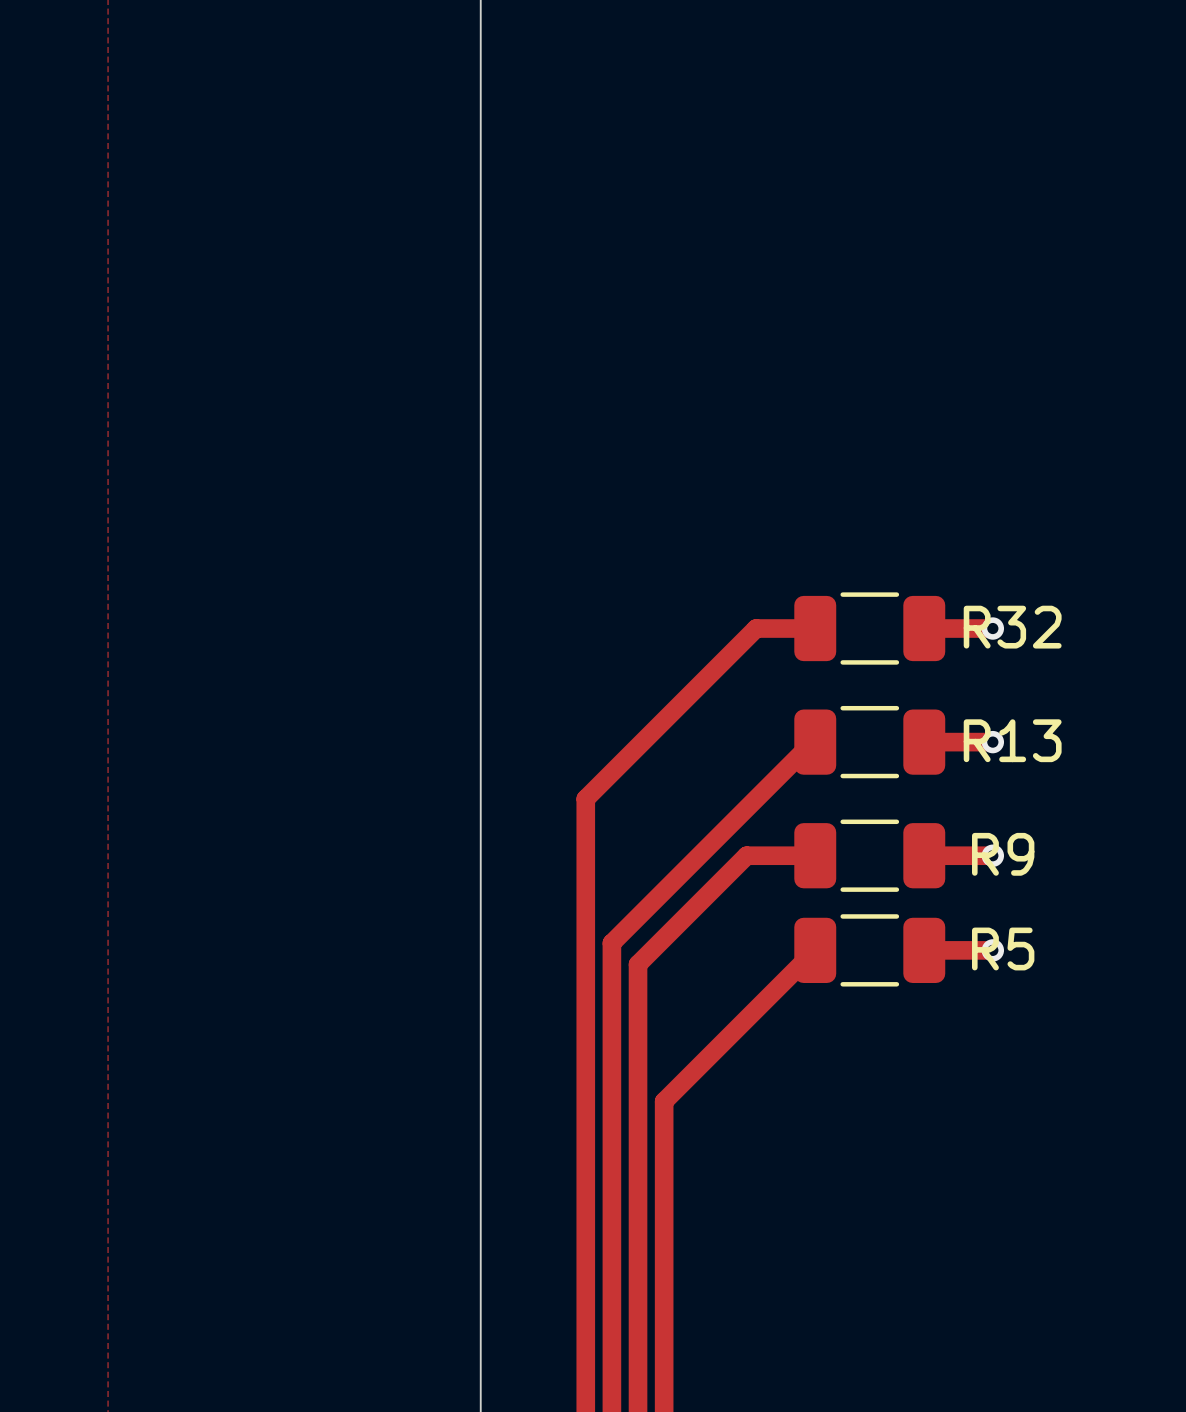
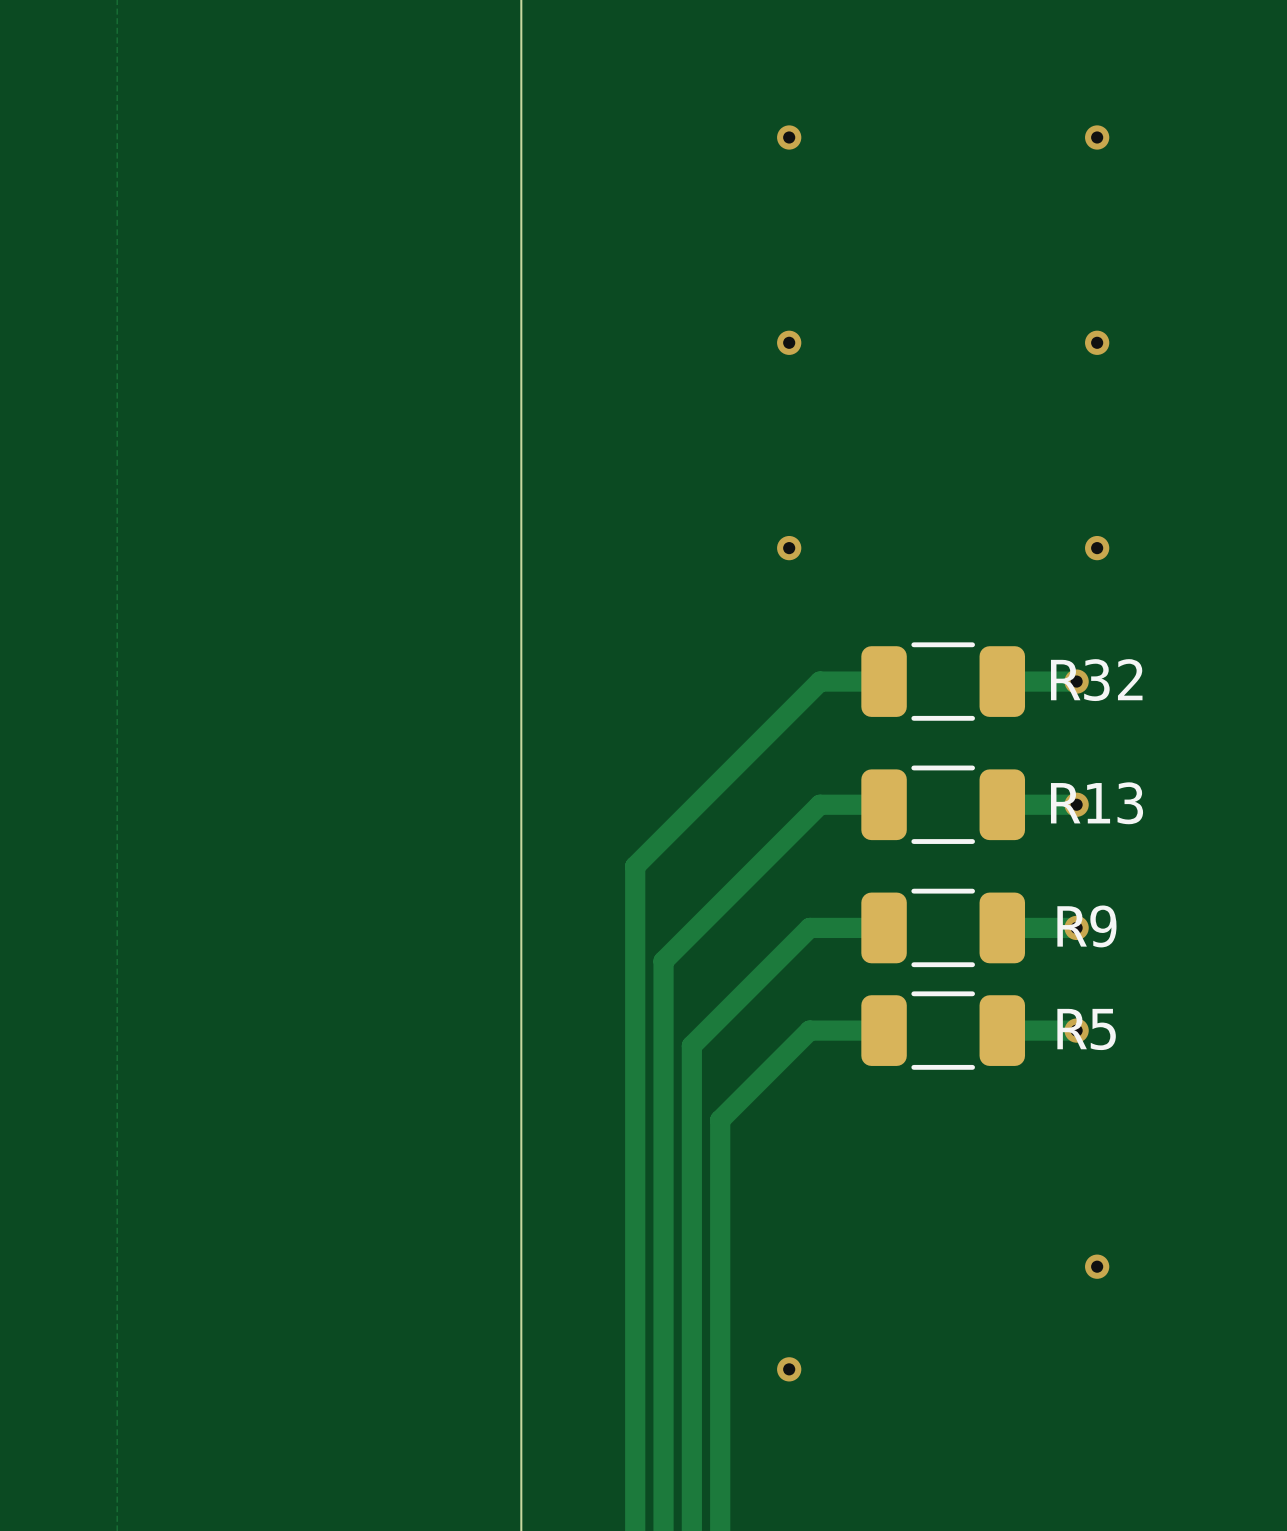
via: none -> (789, 137)
via: none -> (1097, 137)
via: none -> (789, 342)
via: none -> (1097, 342)
via: none -> (789, 548)
via: none -> (1097, 548)
track: (812, 742) (611, 943) -> (881, 804) (819, 804) (663, 961) (663, 1022)
track: (815, 950) (664, 1101) -> (884, 1030) (809, 1030) (720, 1120) (720, 1194)
via: none -> (1097, 1266)
via: none -> (789, 1369)

